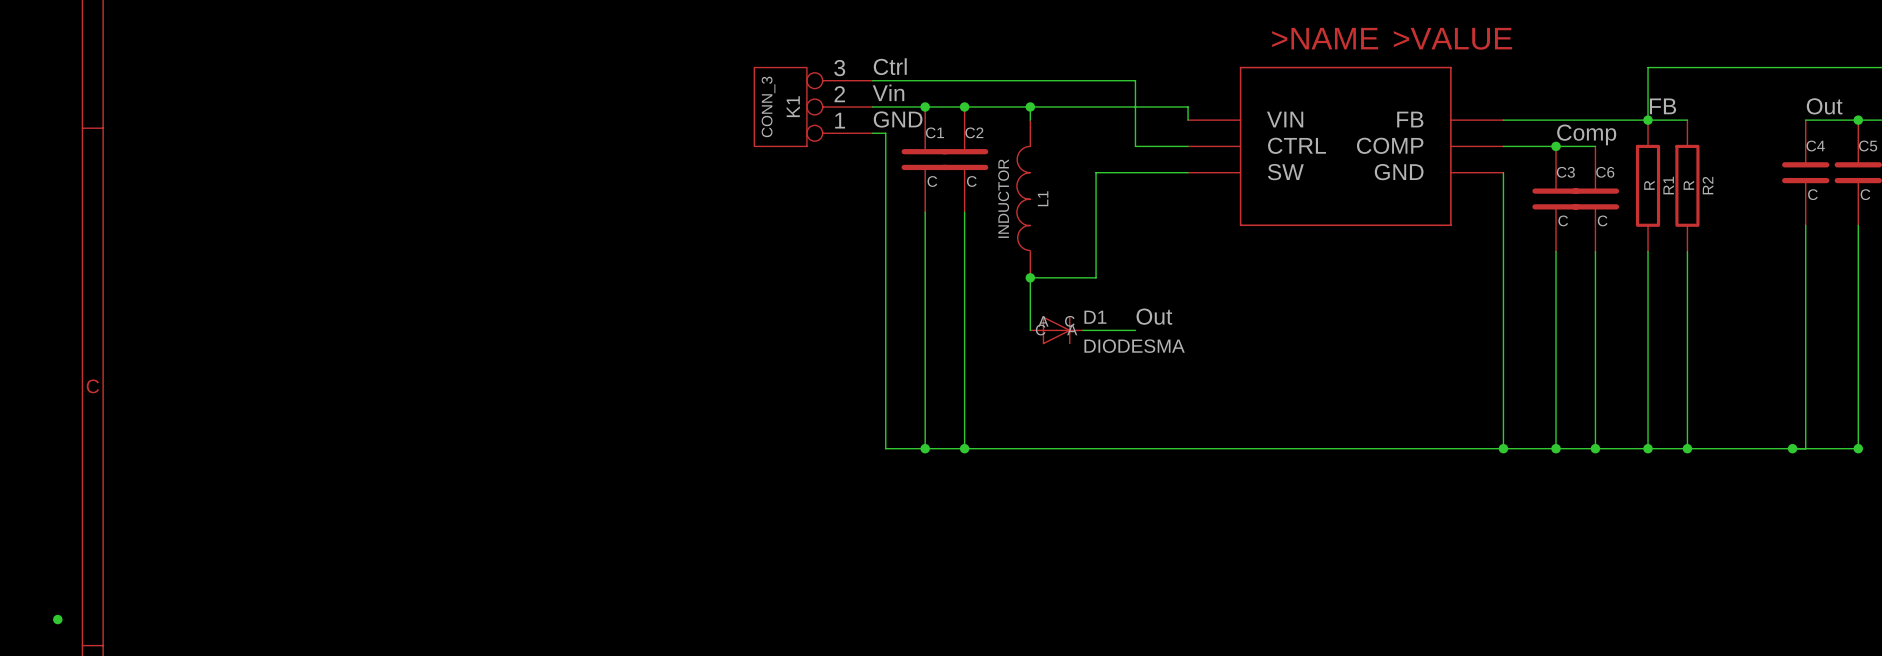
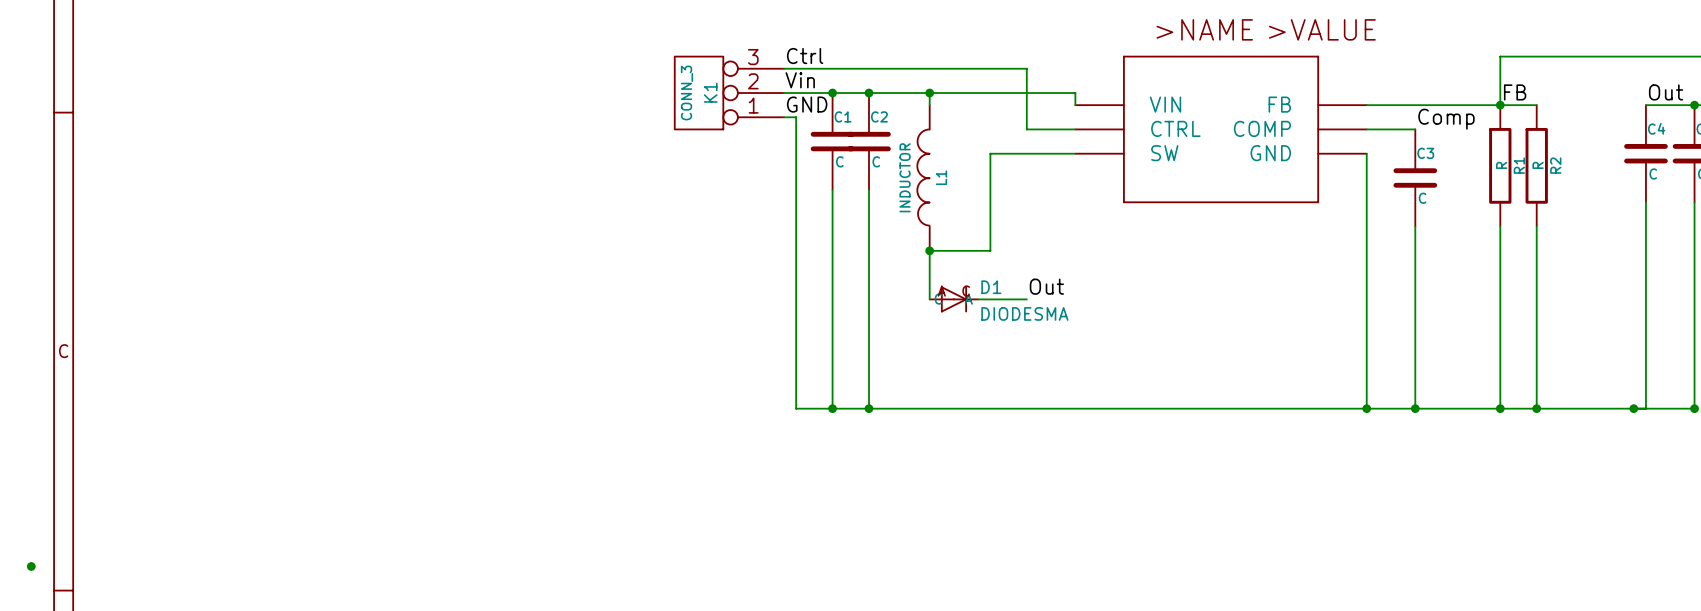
wire: (1556, 146) (1595, 146) -> none
junction: (1556, 146) -> none
C6: C (1595, 198) -> none
wire: (1595, 251) (1595, 448) -> none
junction: (1595, 448) -> none

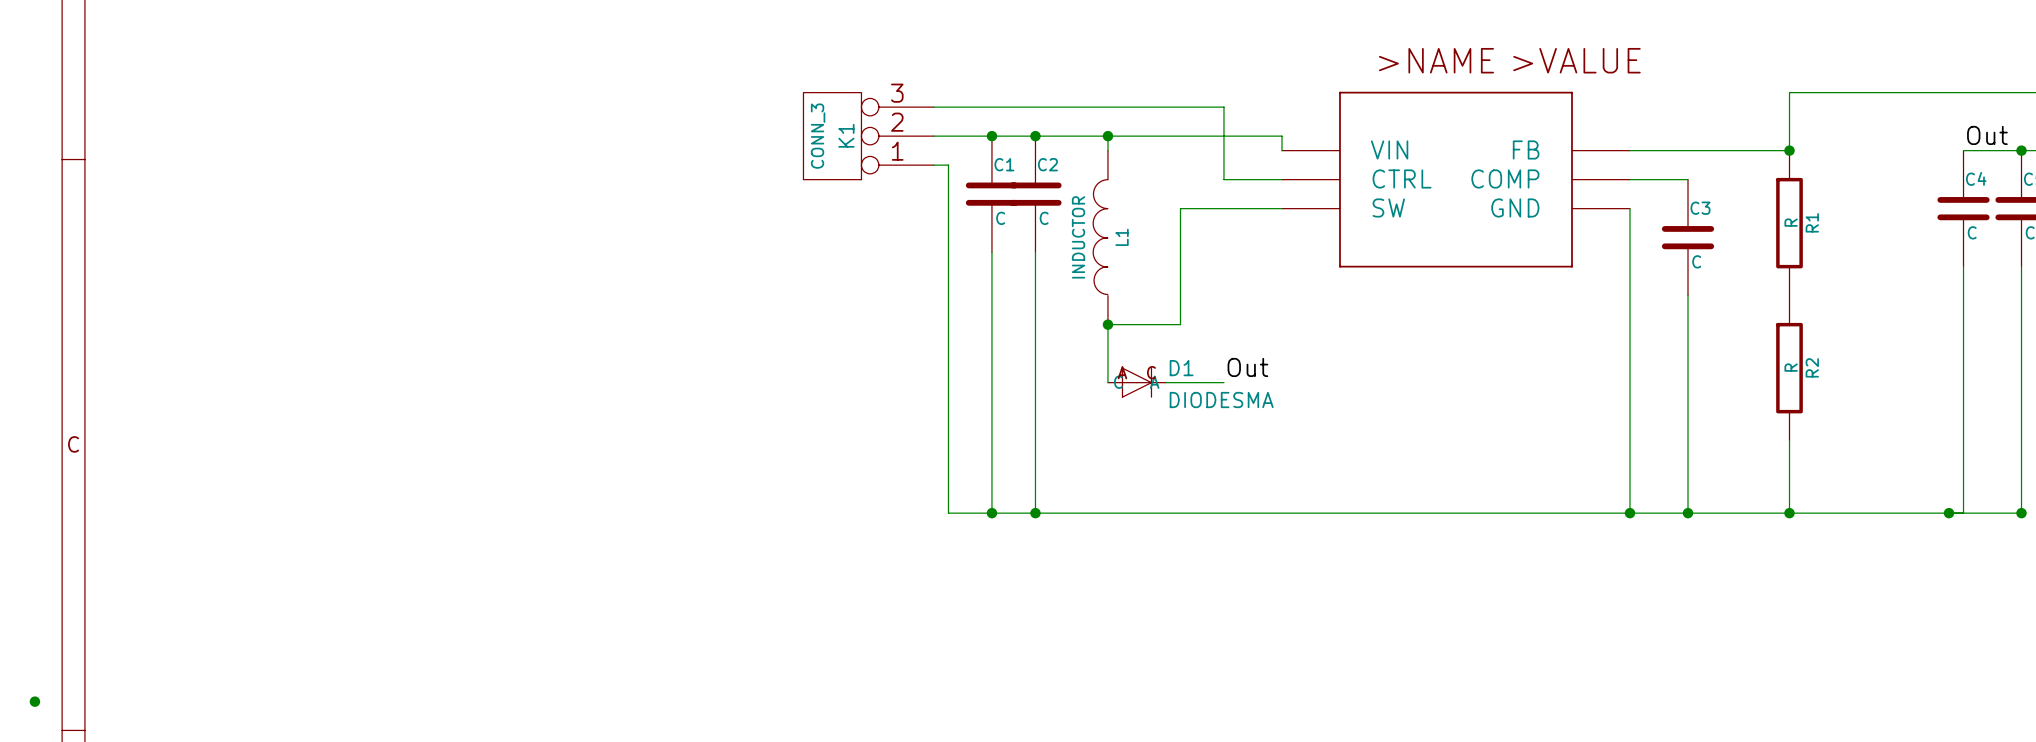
label: Ctrl (805, 56) -> none
label: Vin (800, 80) -> none
label: FB (1515, 92) -> none
label: GND (807, 104) -> none
wire: (1500, 105) (1536, 105) -> none
label: Comp (1446, 119) -> none
R2 position: (1536, 165) -> (1789, 368)
wire: (1500, 226) (1500, 347) -> none
wire: (1536, 226) (1536, 408) -> none
junction: (1536, 408) -> none

